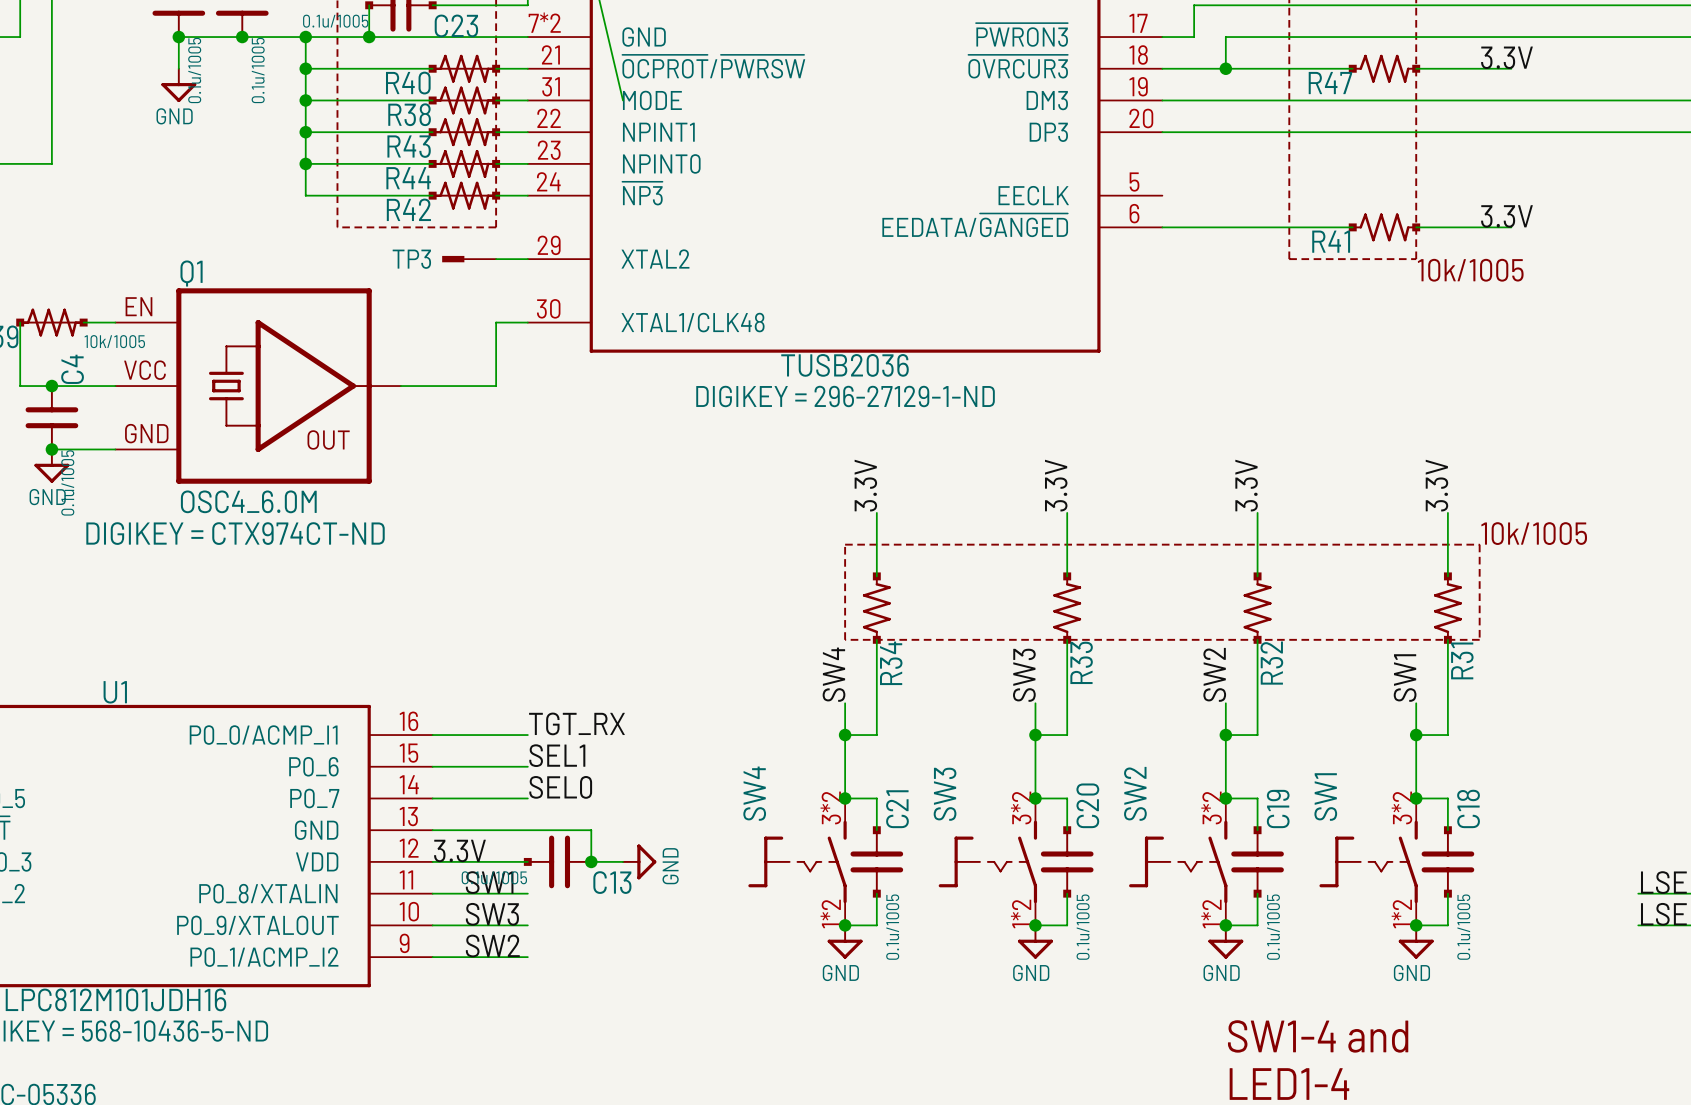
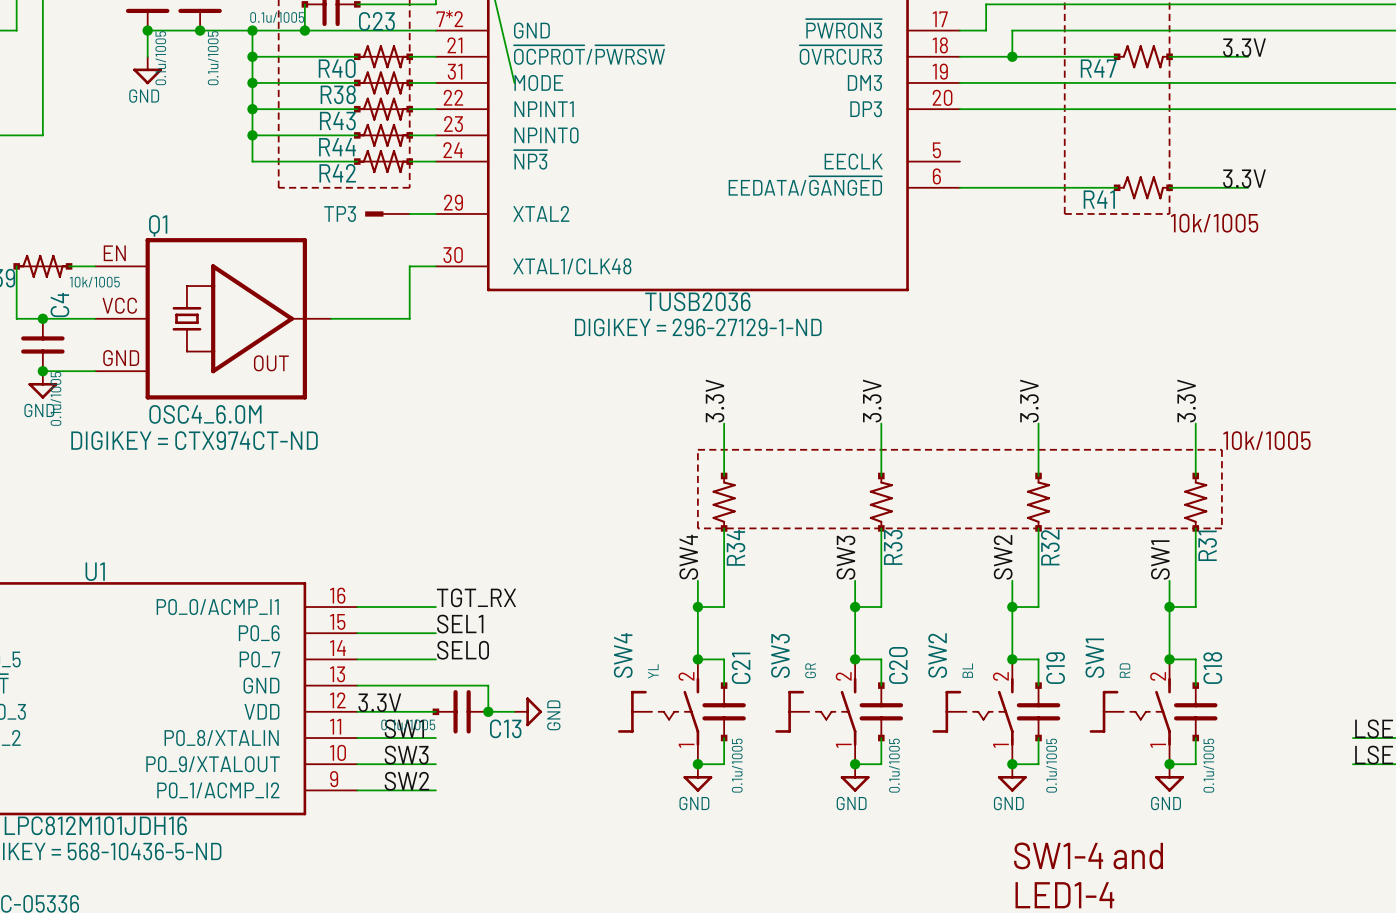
SW4 pin number: 3*2 (830, 807) -> 2 (686, 676)
SW3 pin number: 3*2 (1021, 807) -> 2 (843, 676)
SW2 pin number: 3*2 (1211, 807) -> 2 (1000, 676)
SW1 pin number: 3*2 (1401, 807) -> 2 (1158, 676)
SW1 value: none -> RD (1125, 670)
SW3 value: none -> GR (810, 670)
SW2 value: none -> BL (967, 670)
SW4 value: none -> YL (653, 671)
SW4 pin number: 1*2 (830, 913) -> 1 (686, 745)
SW3 pin number: 1*2 (1021, 913) -> 1 (843, 745)
SW2 pin number: 1*2 (1211, 913) -> 1 (1000, 745)
SW1 pin number: 1*2 (1401, 913) -> 1 (1158, 745)

